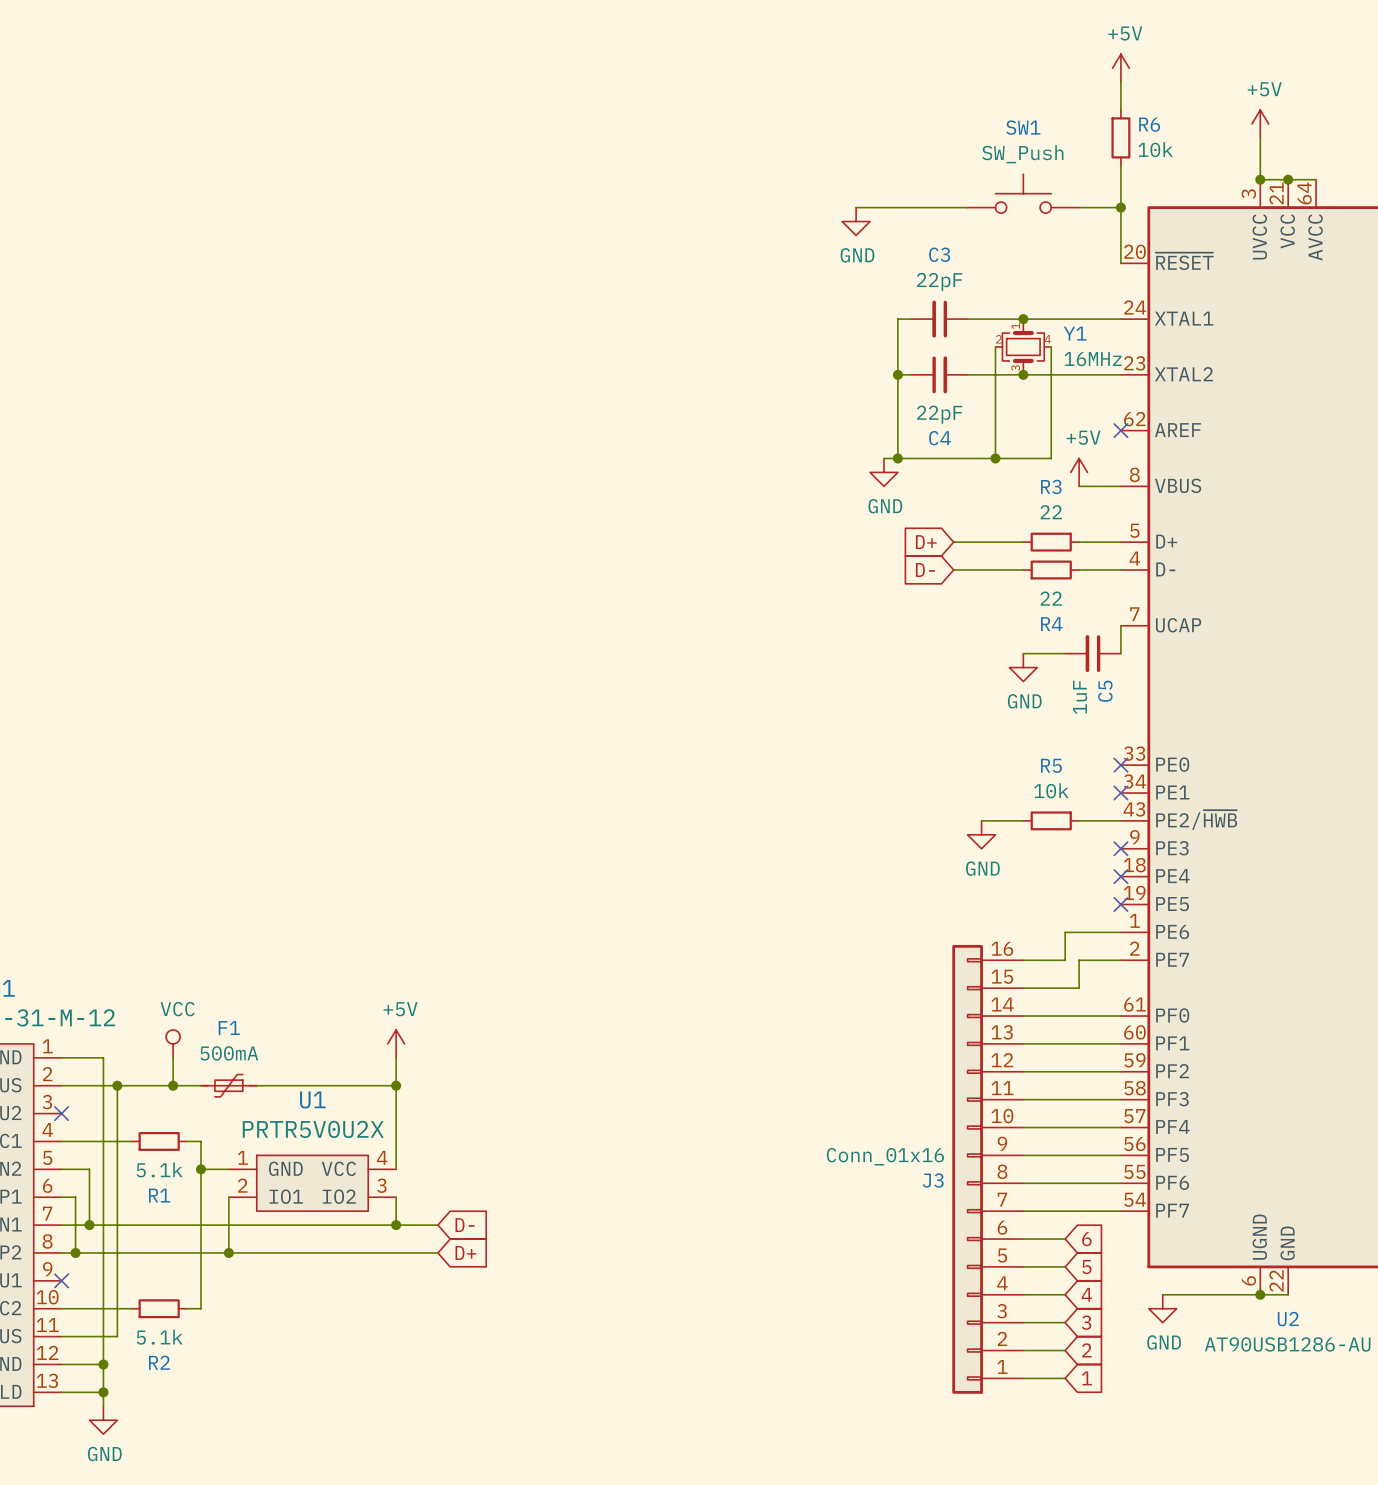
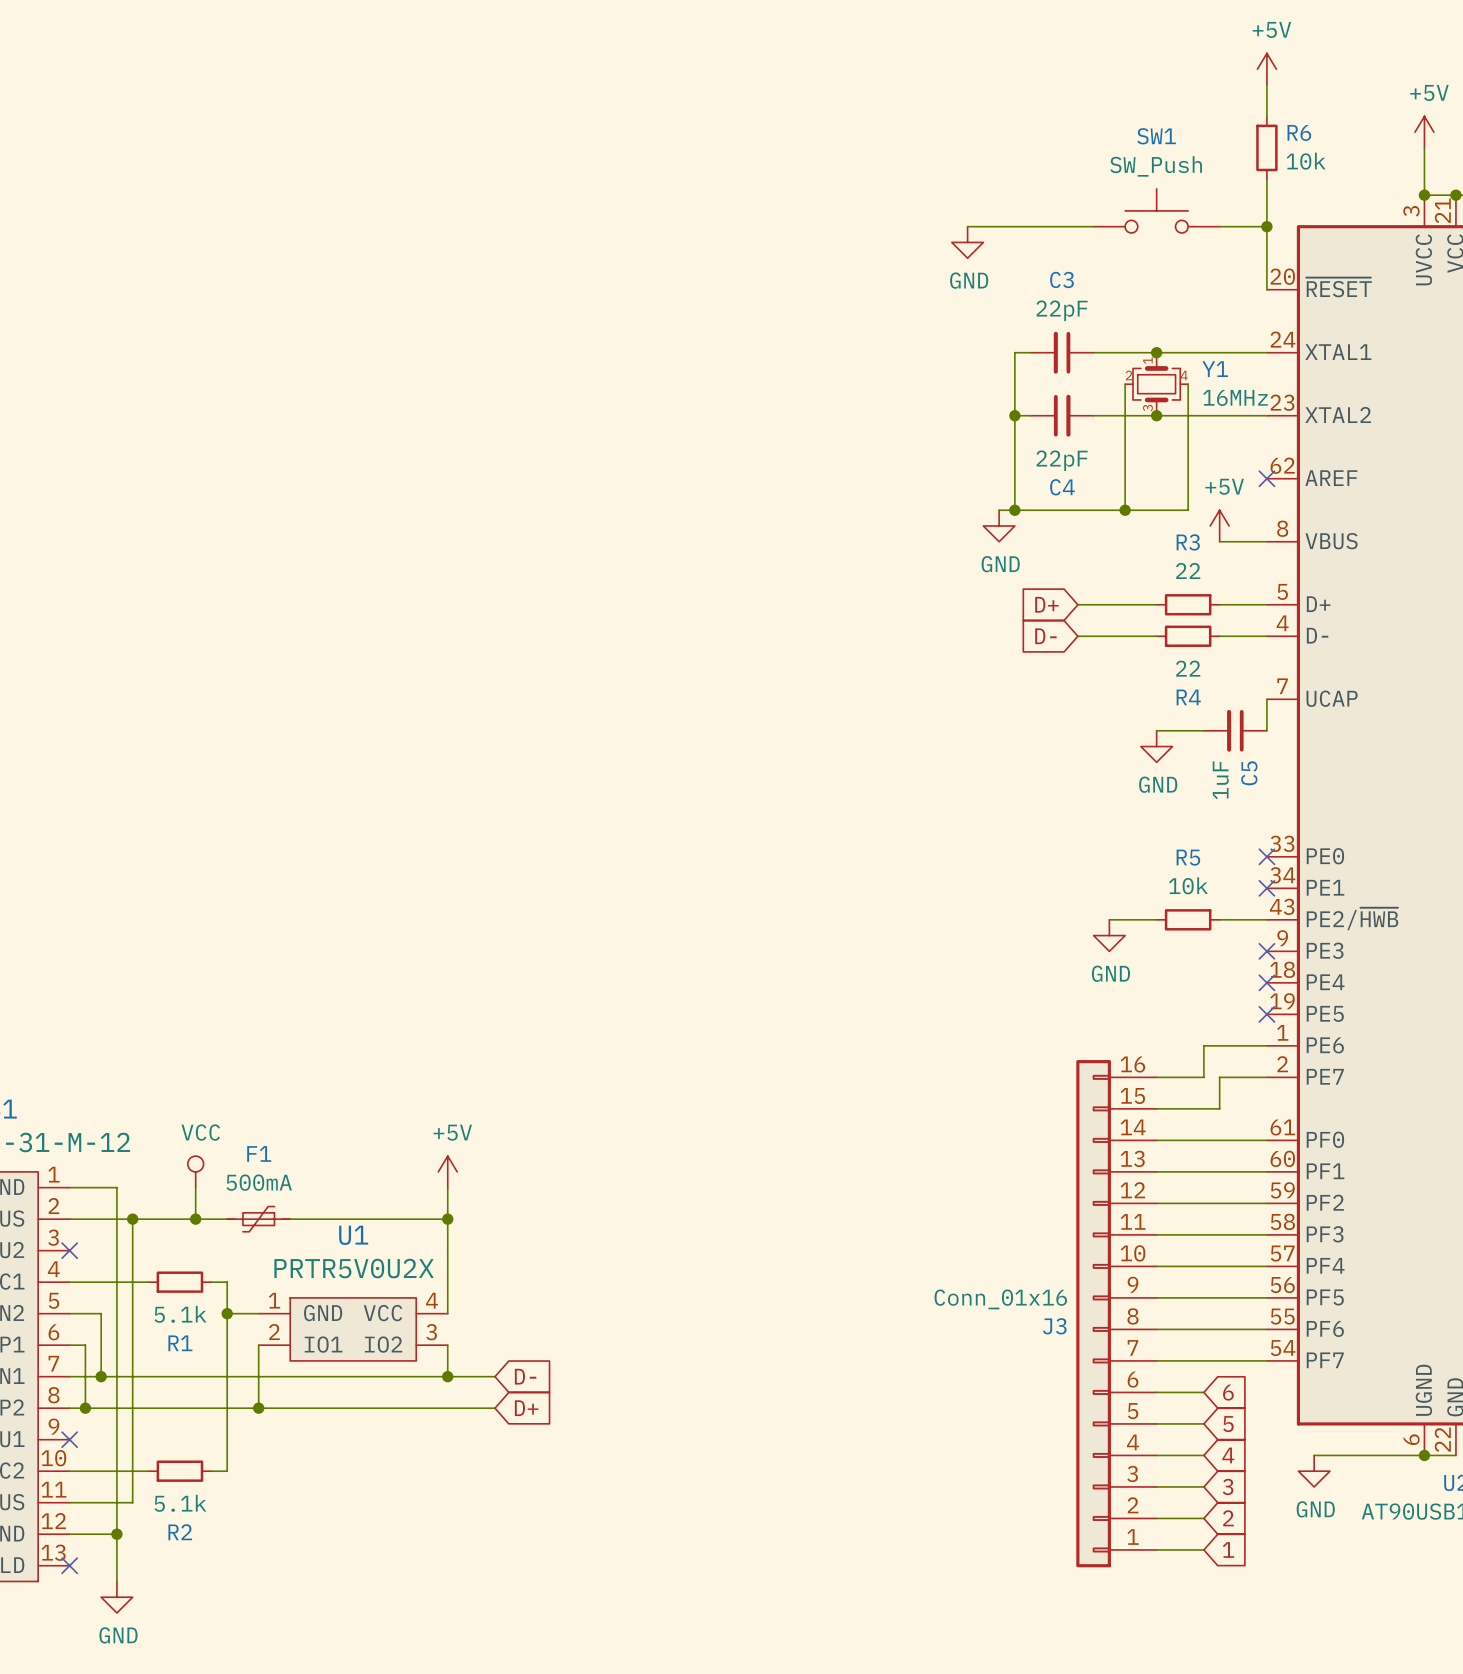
wire: (61, 1392) (103, 1392) -> none
no-connect mark: none -> (69, 1565)
junction: (103, 1392) -> none

